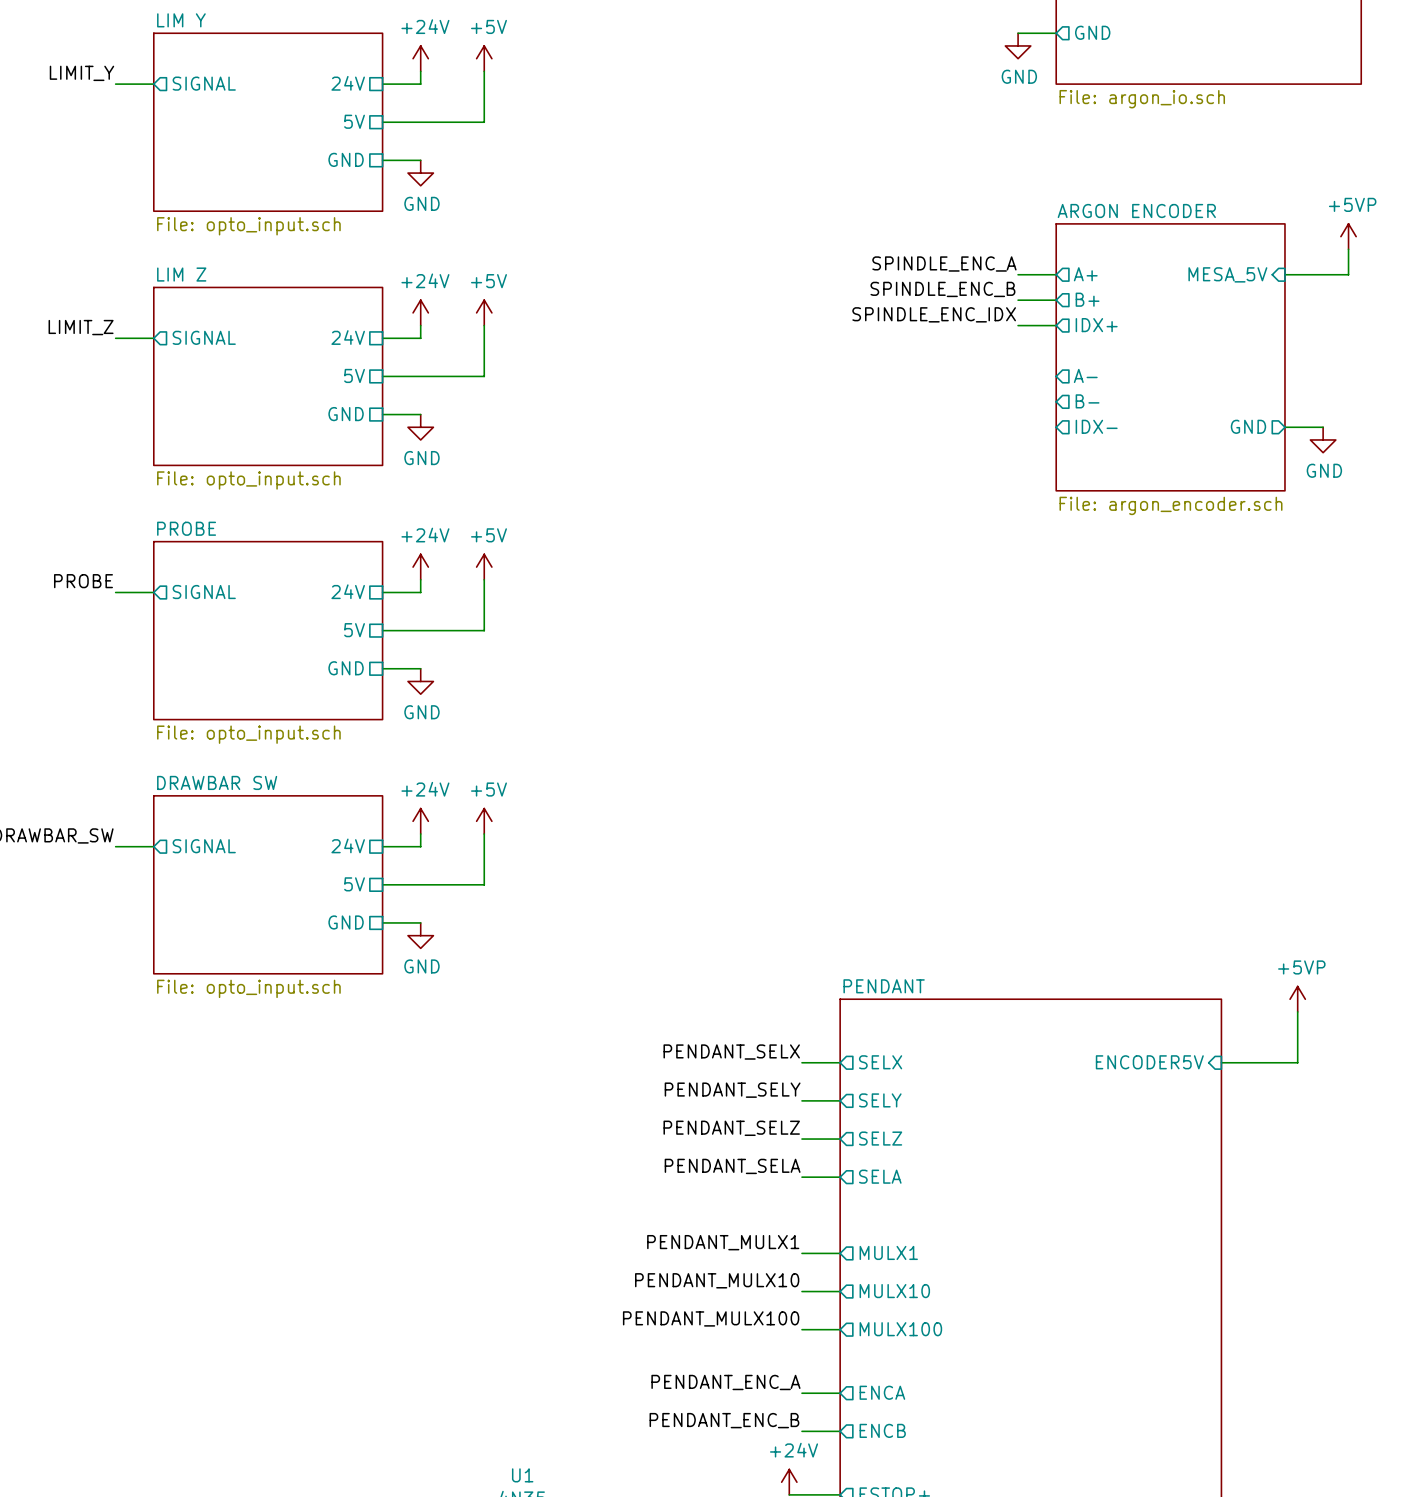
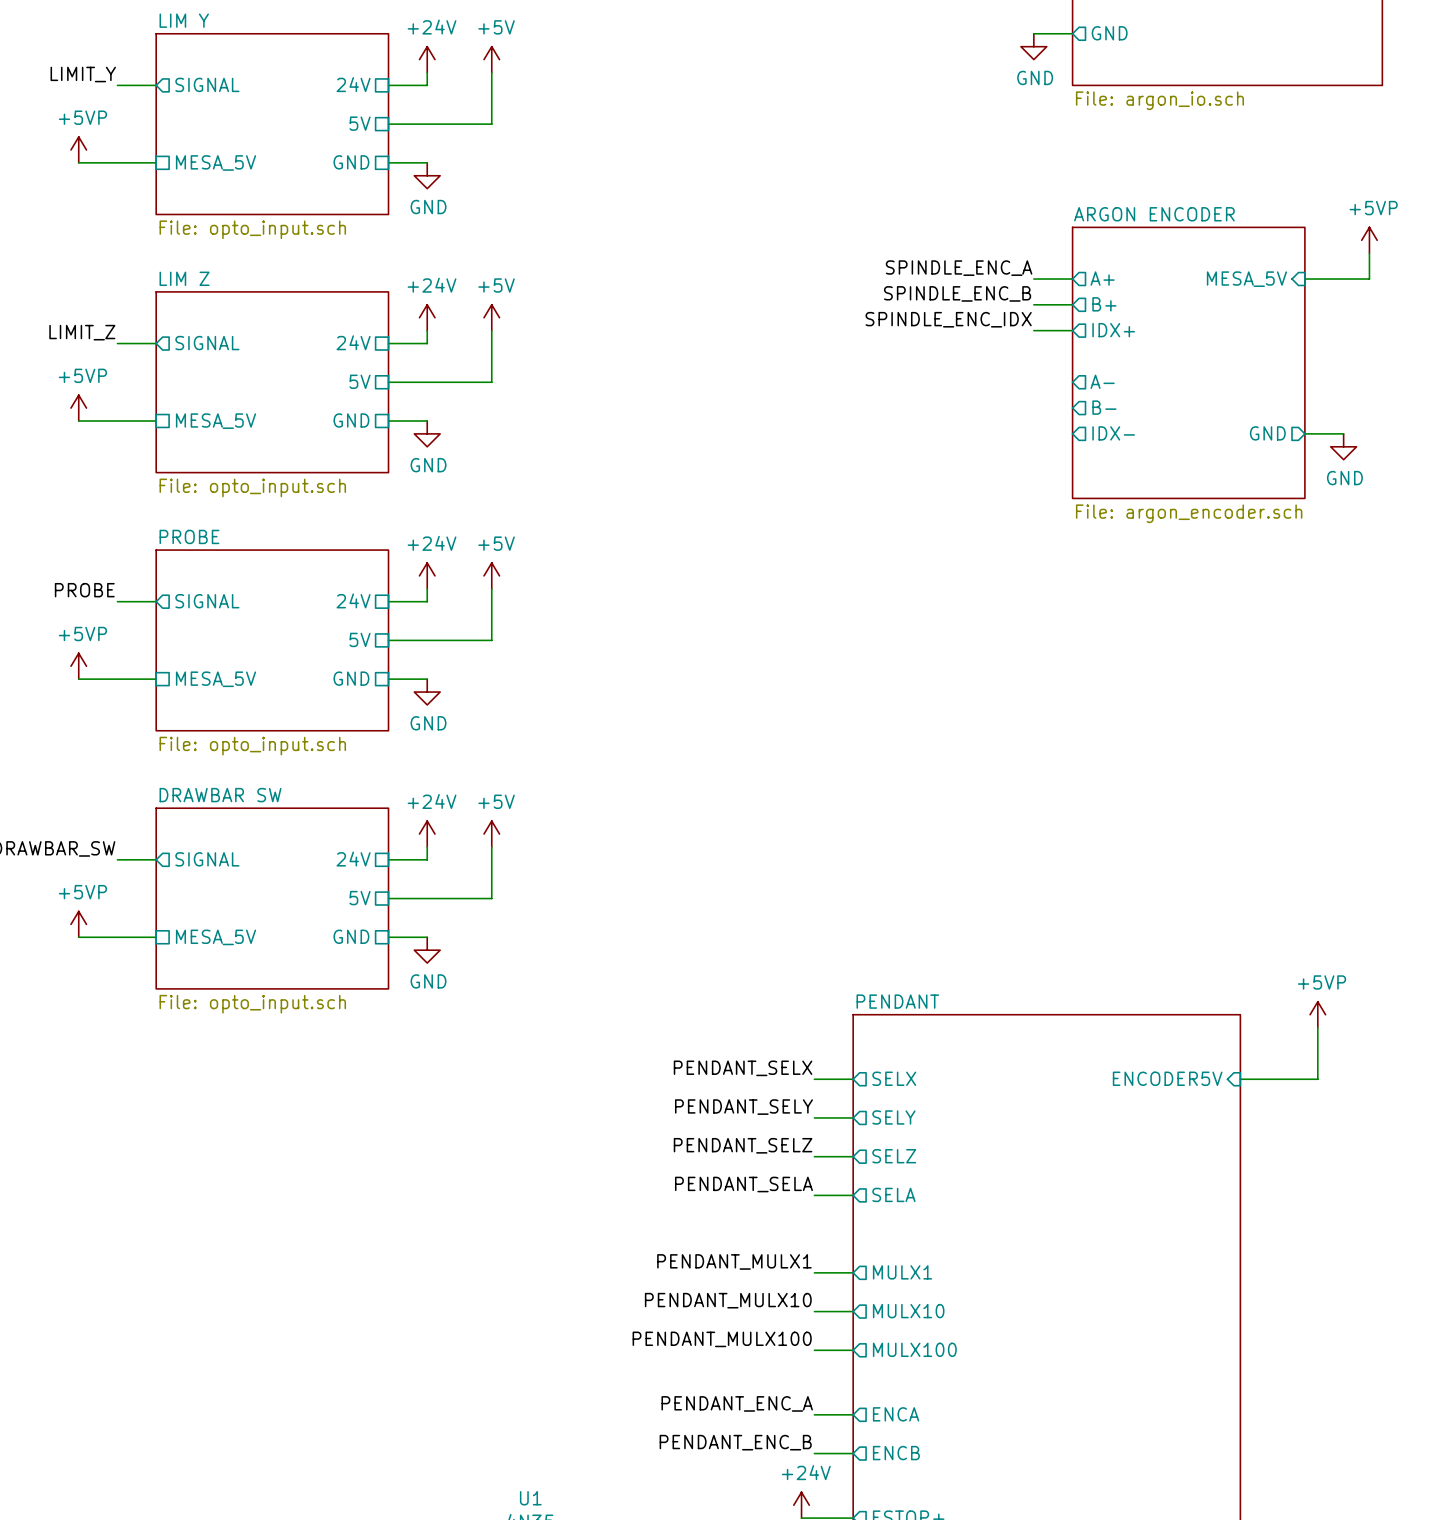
power symbol: none -> +5VP (78, 149)
wire: none -> (78, 162) (156, 162)
sheet pin: none -> MESA_5V (216, 162)
power symbol: none -> +5VP (78, 408)
wire: none -> (78, 420) (156, 420)
sheet pin: none -> MESA_5V (216, 421)
power symbol: none -> +5VP (78, 666)
wire: none -> (78, 679) (156, 679)
sheet pin: none -> MESA_5V (216, 679)
power symbol: none -> +5VP (78, 924)
wire: none -> (78, 937) (156, 937)
sheet pin: none -> MESA_5V (216, 937)

